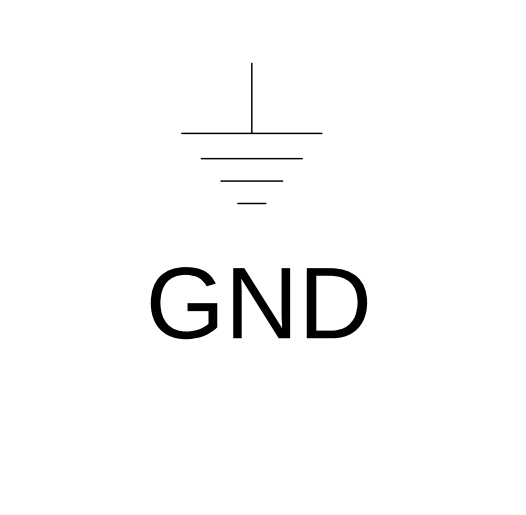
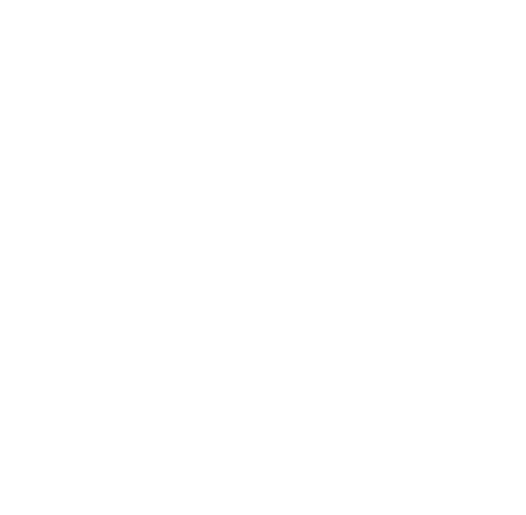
power symbol: GND (251, 133) -> none

